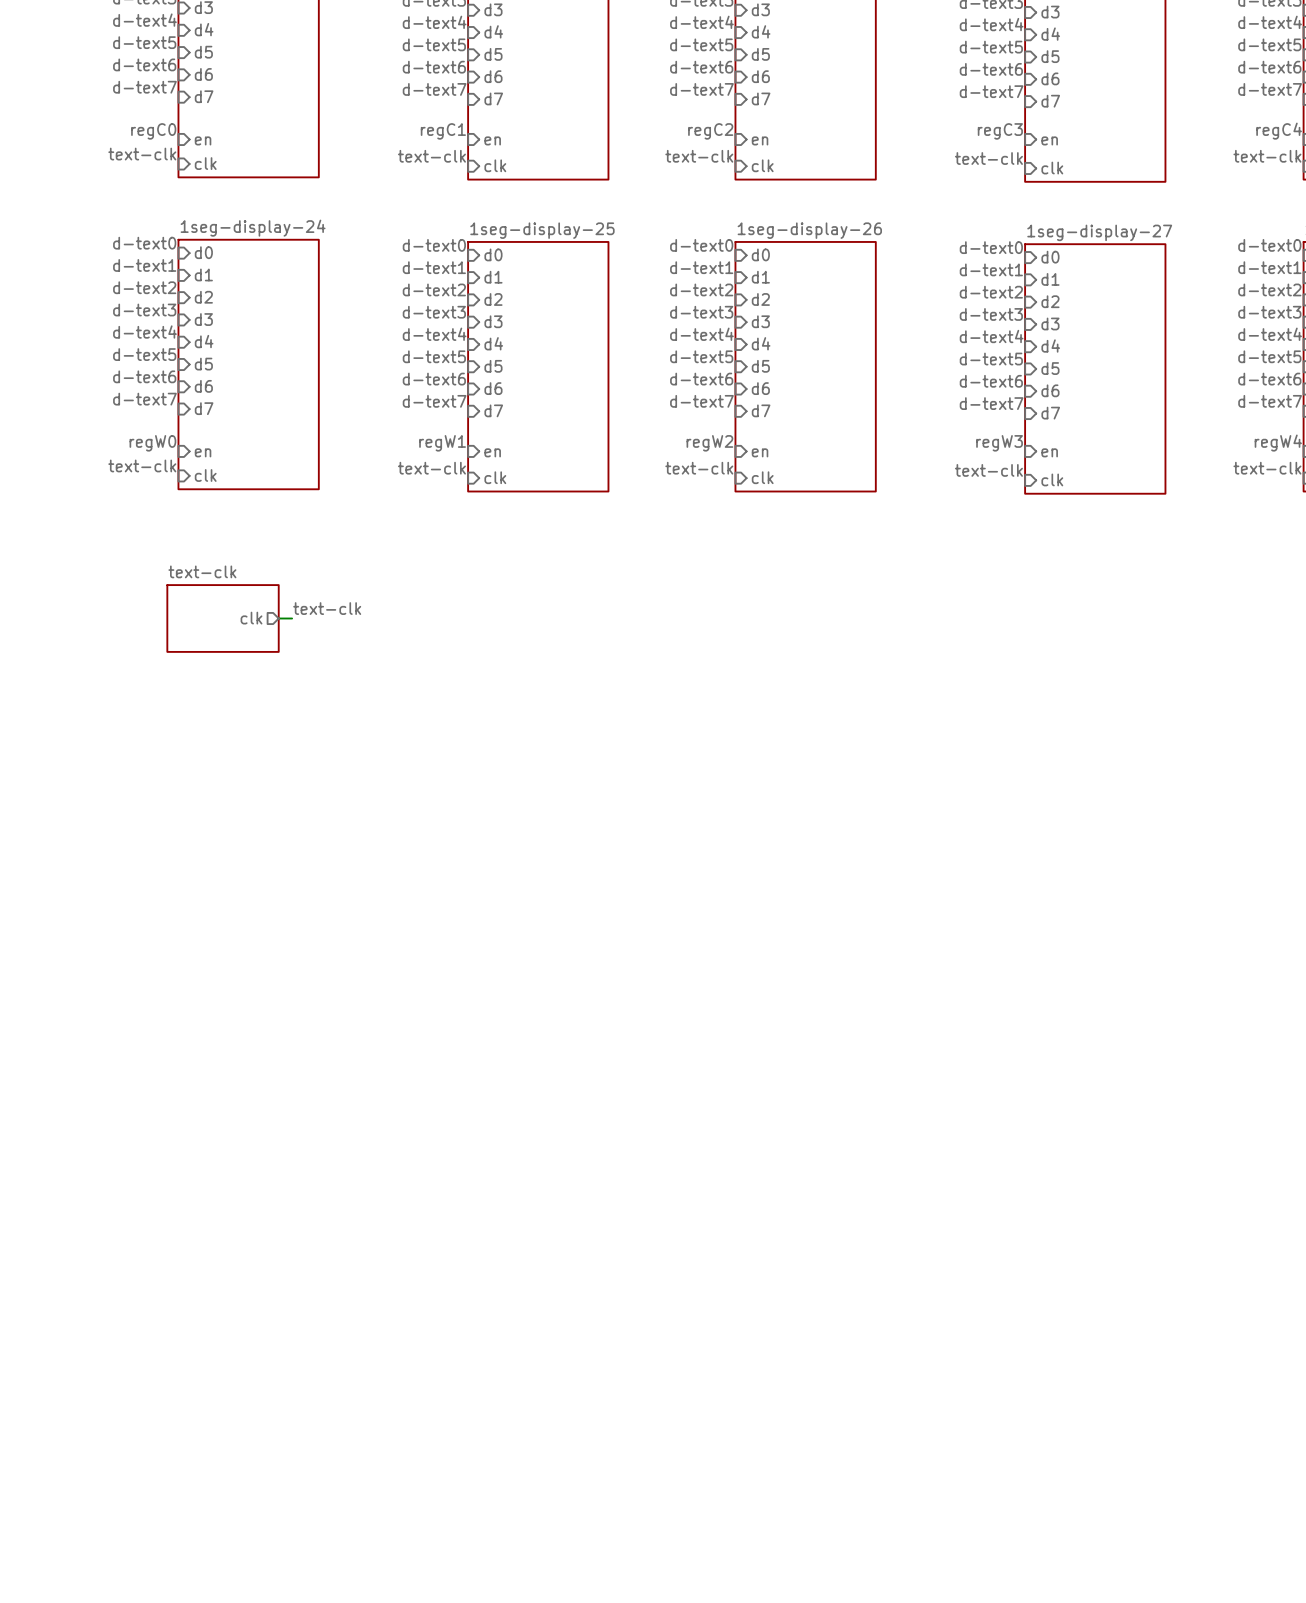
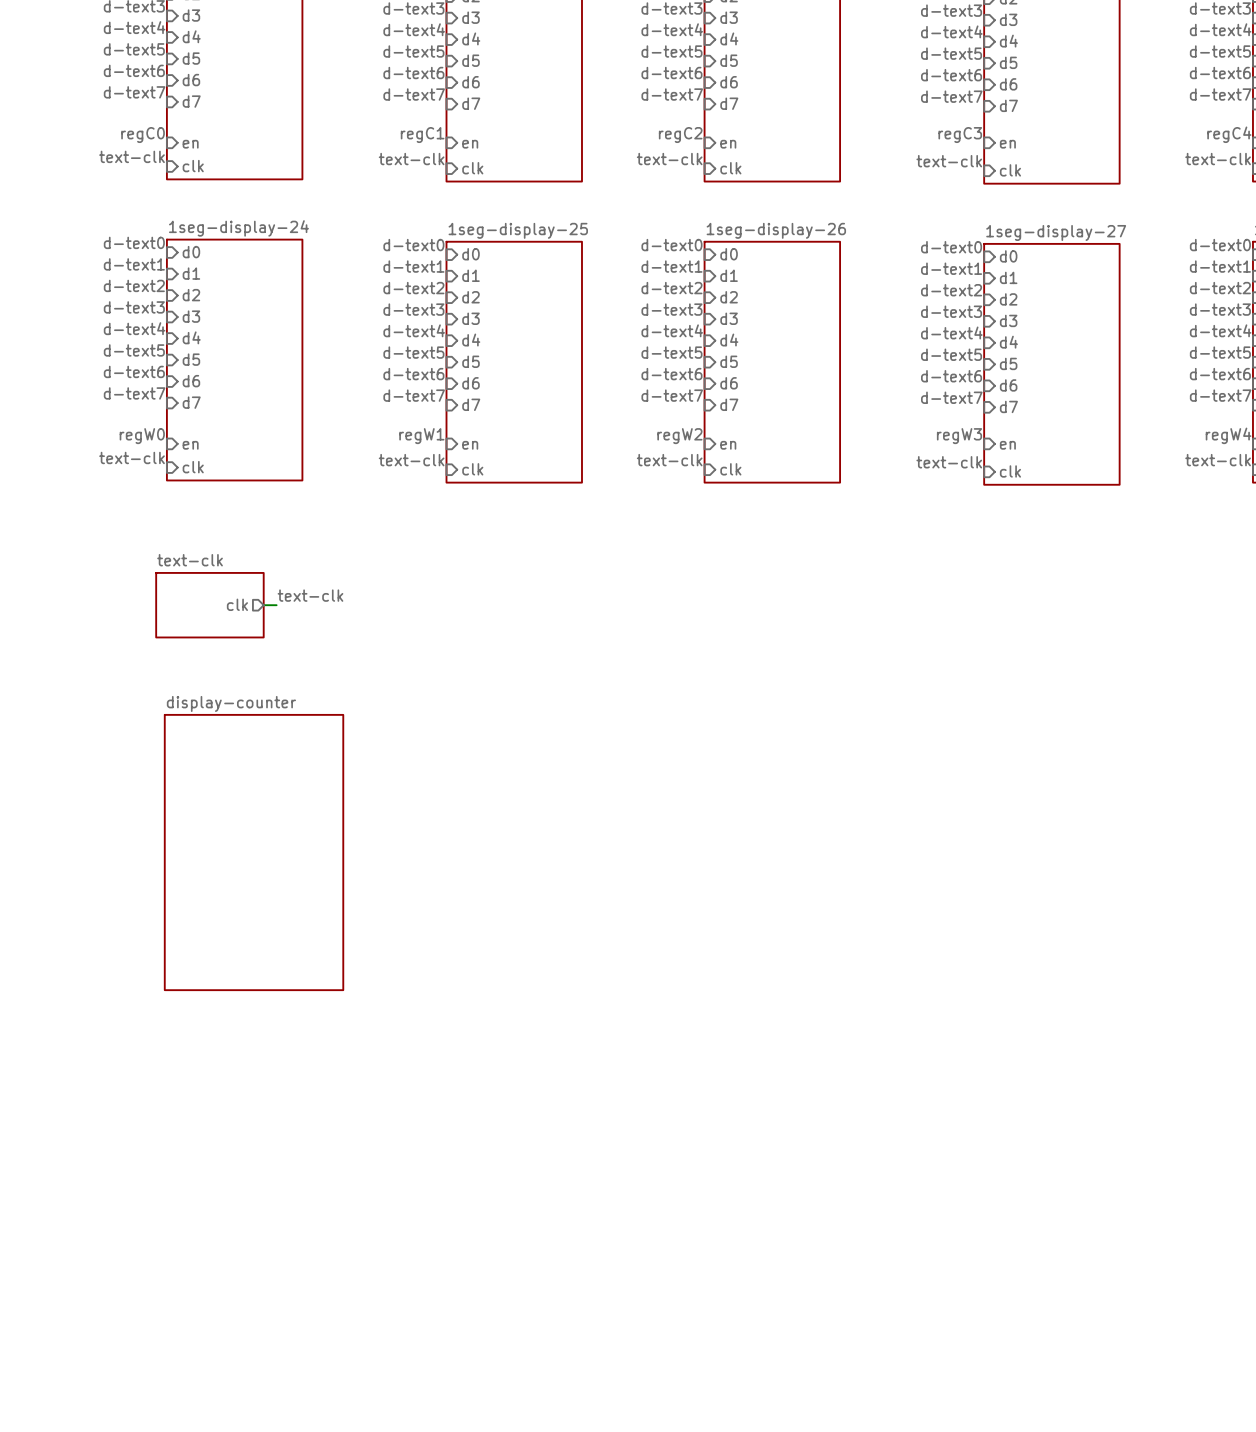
sheet display-counter: none -> (254, 852)

